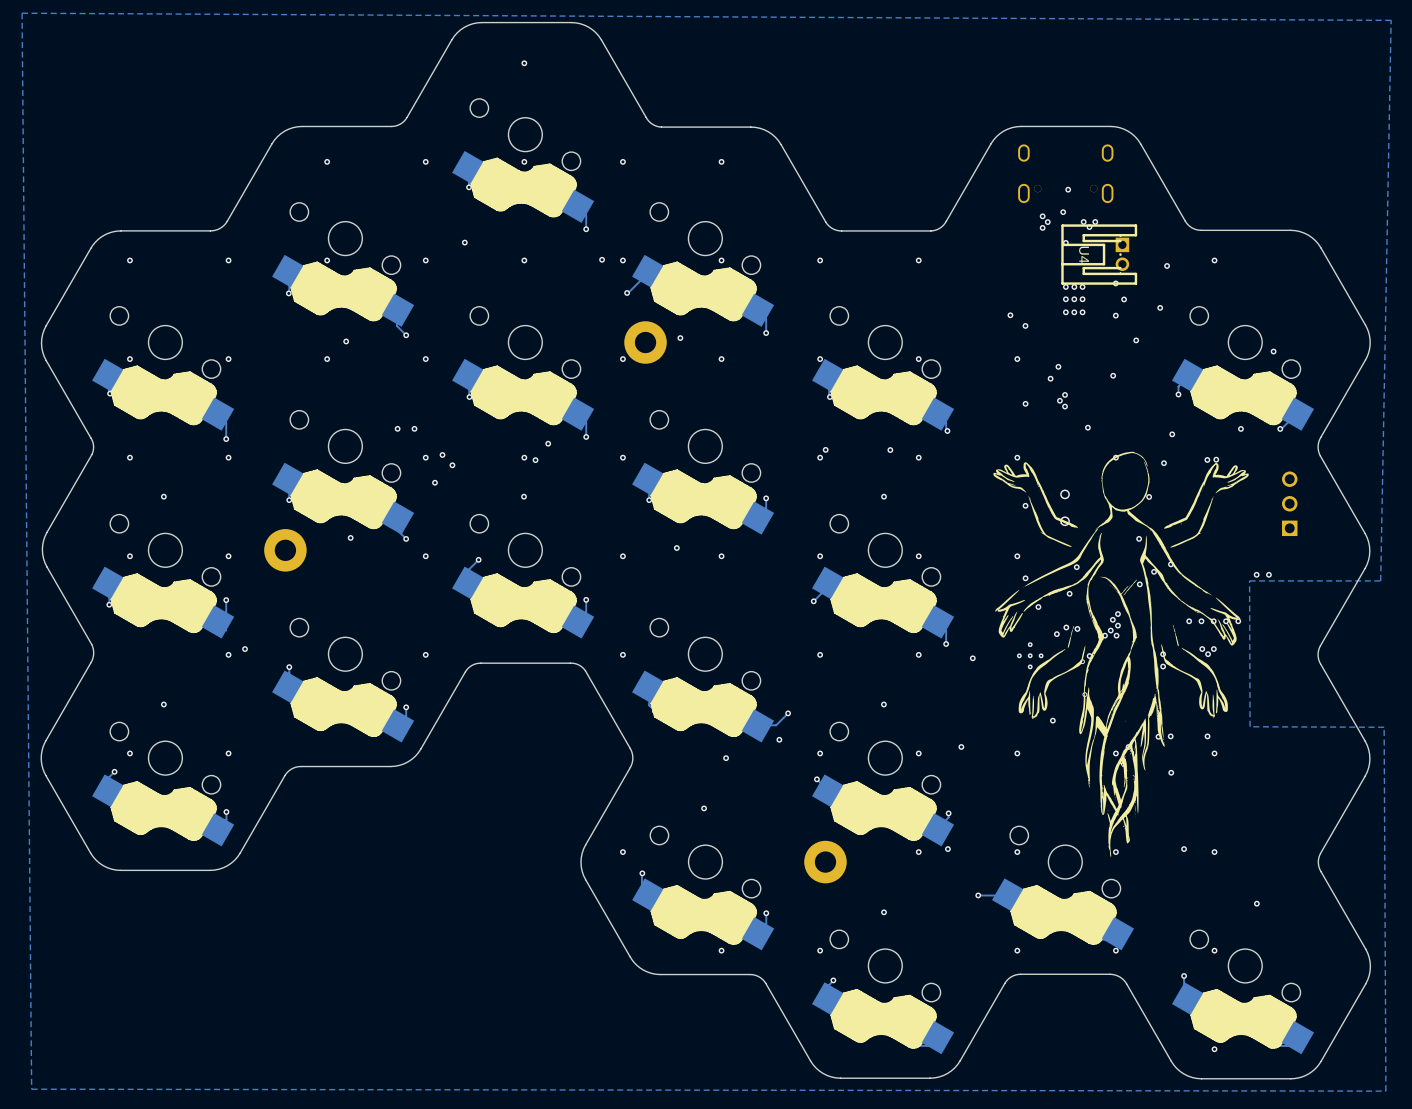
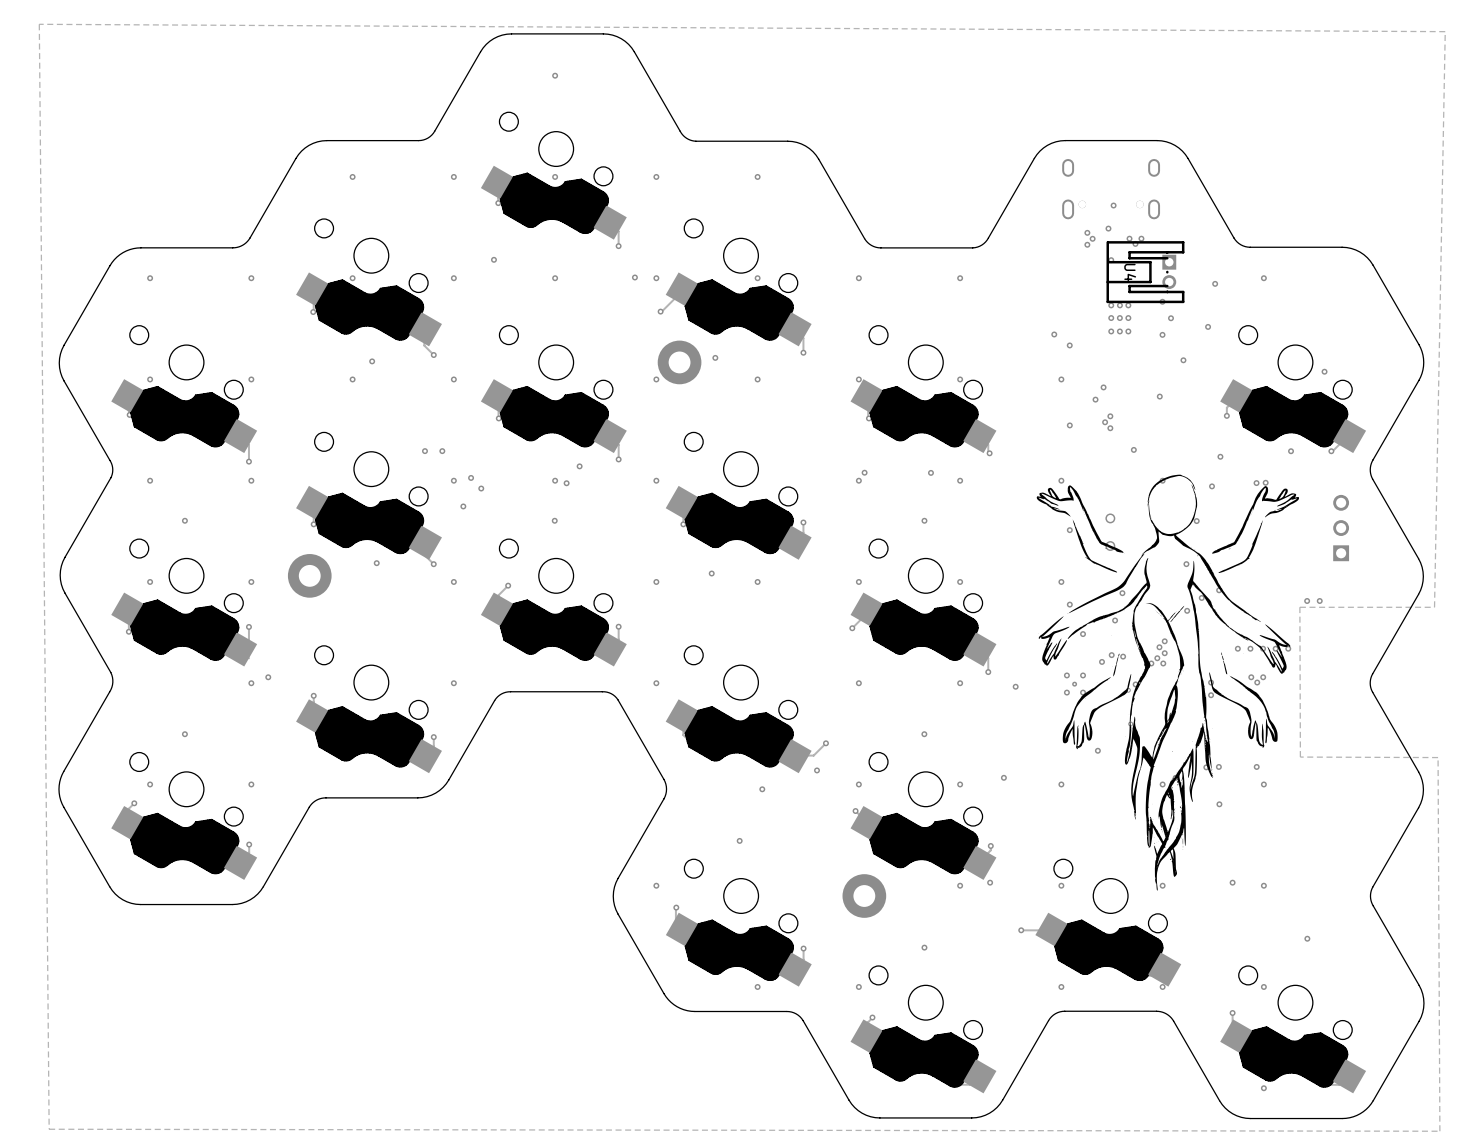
via: (1030, 644) -> none
via: none -> (1066, 675)
via: none -> (1083, 675)
via: (1019, 655) -> none
via: (1041, 655) -> none
via: none -> (1066, 692)
via: none -> (1083, 692)
via: (1030, 666) -> none

